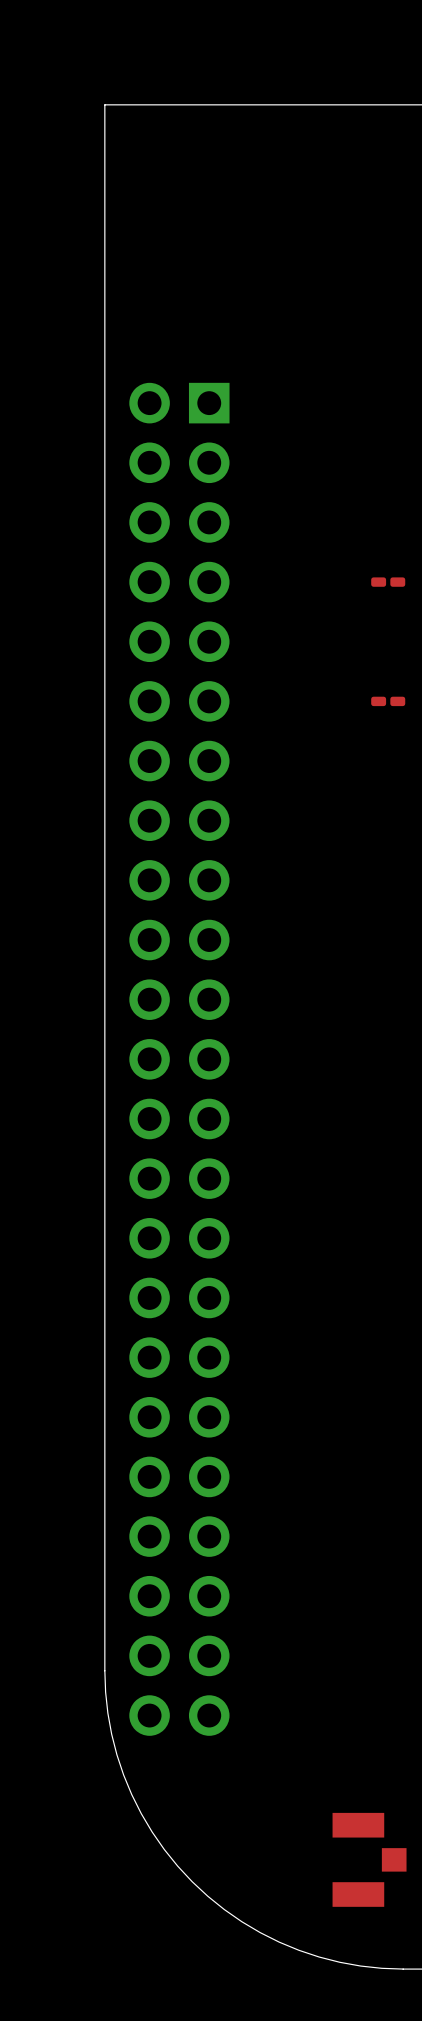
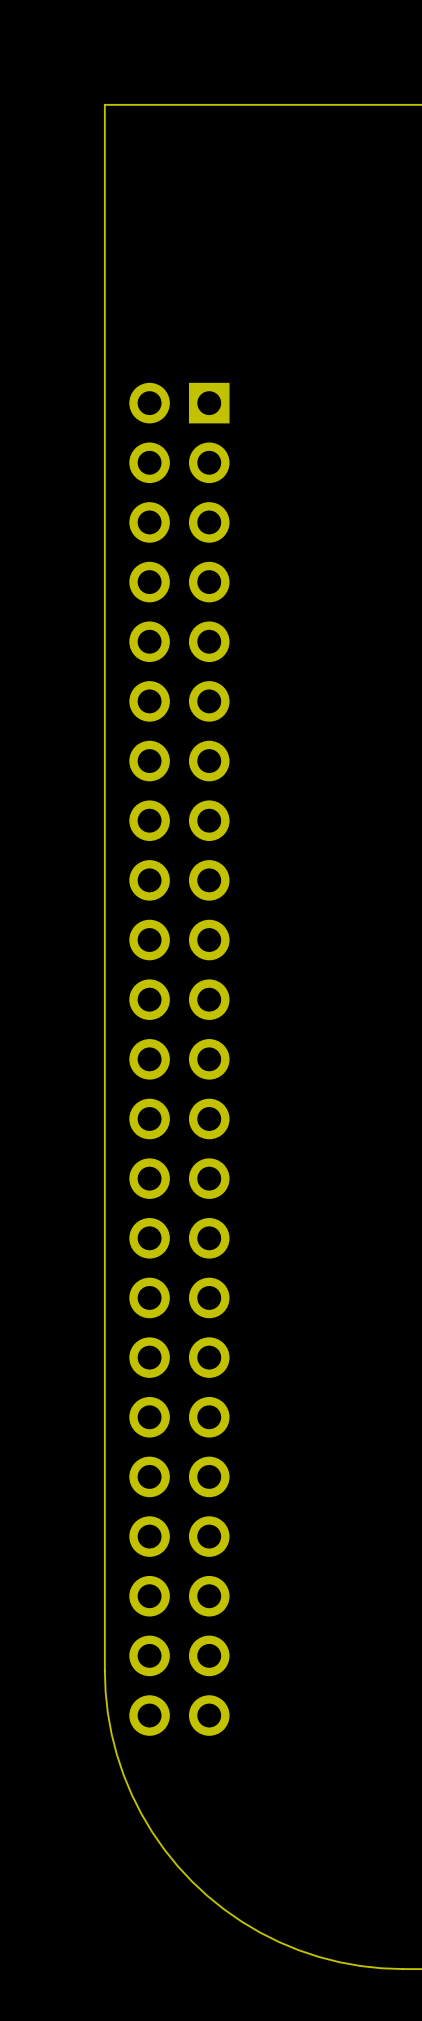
part: (388, 582) -> none
part: (388, 701) -> none
part: (369, 1859) -> none

